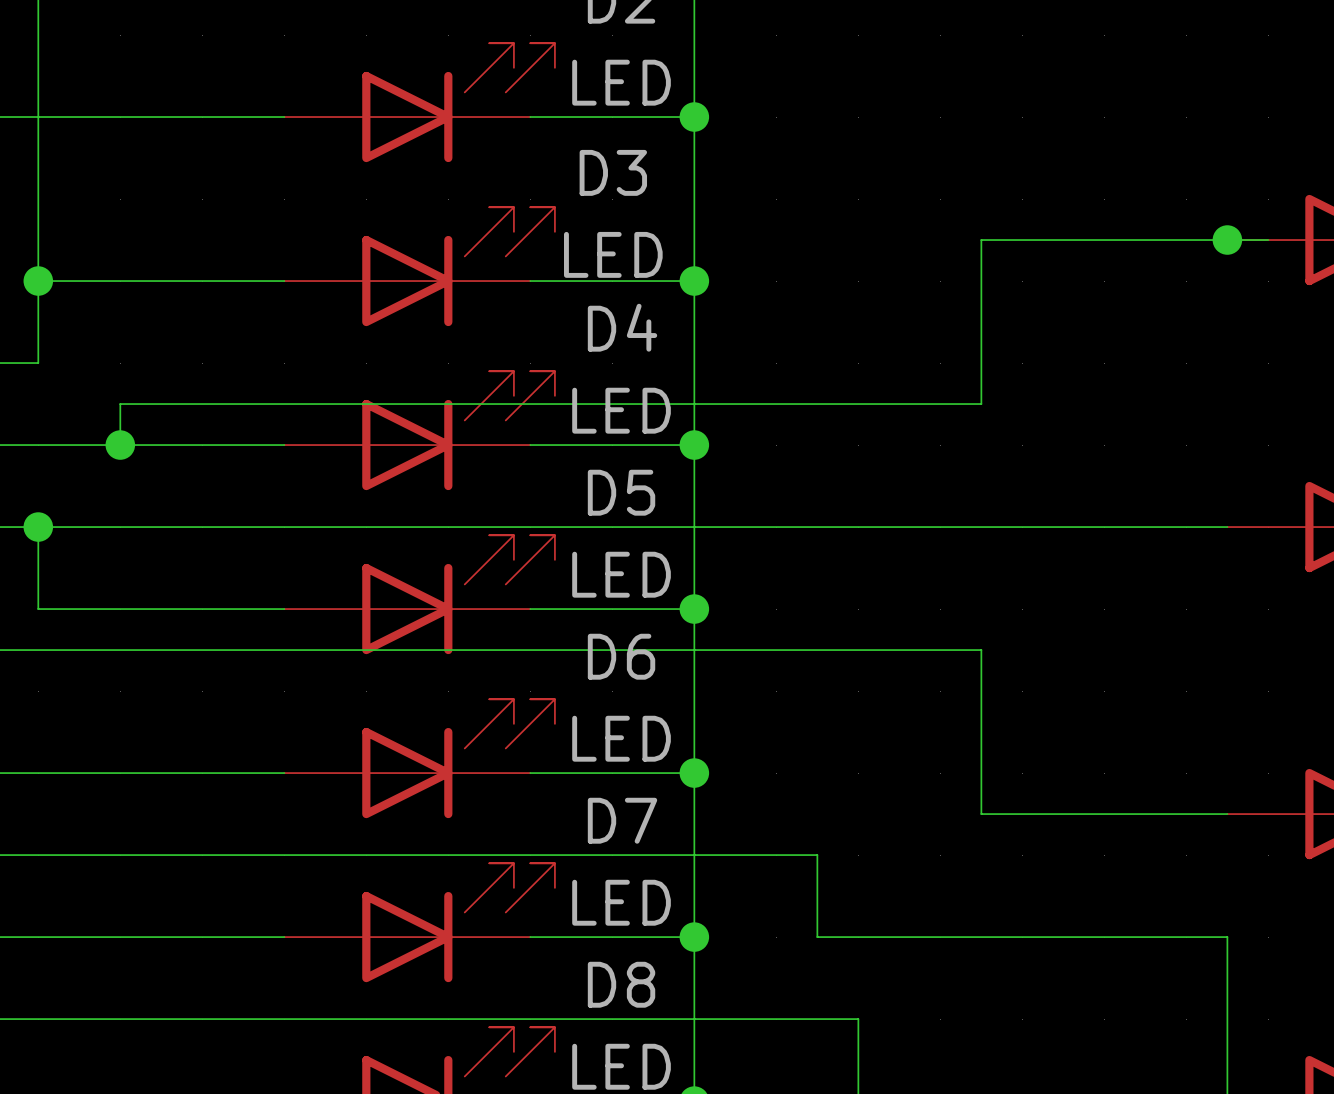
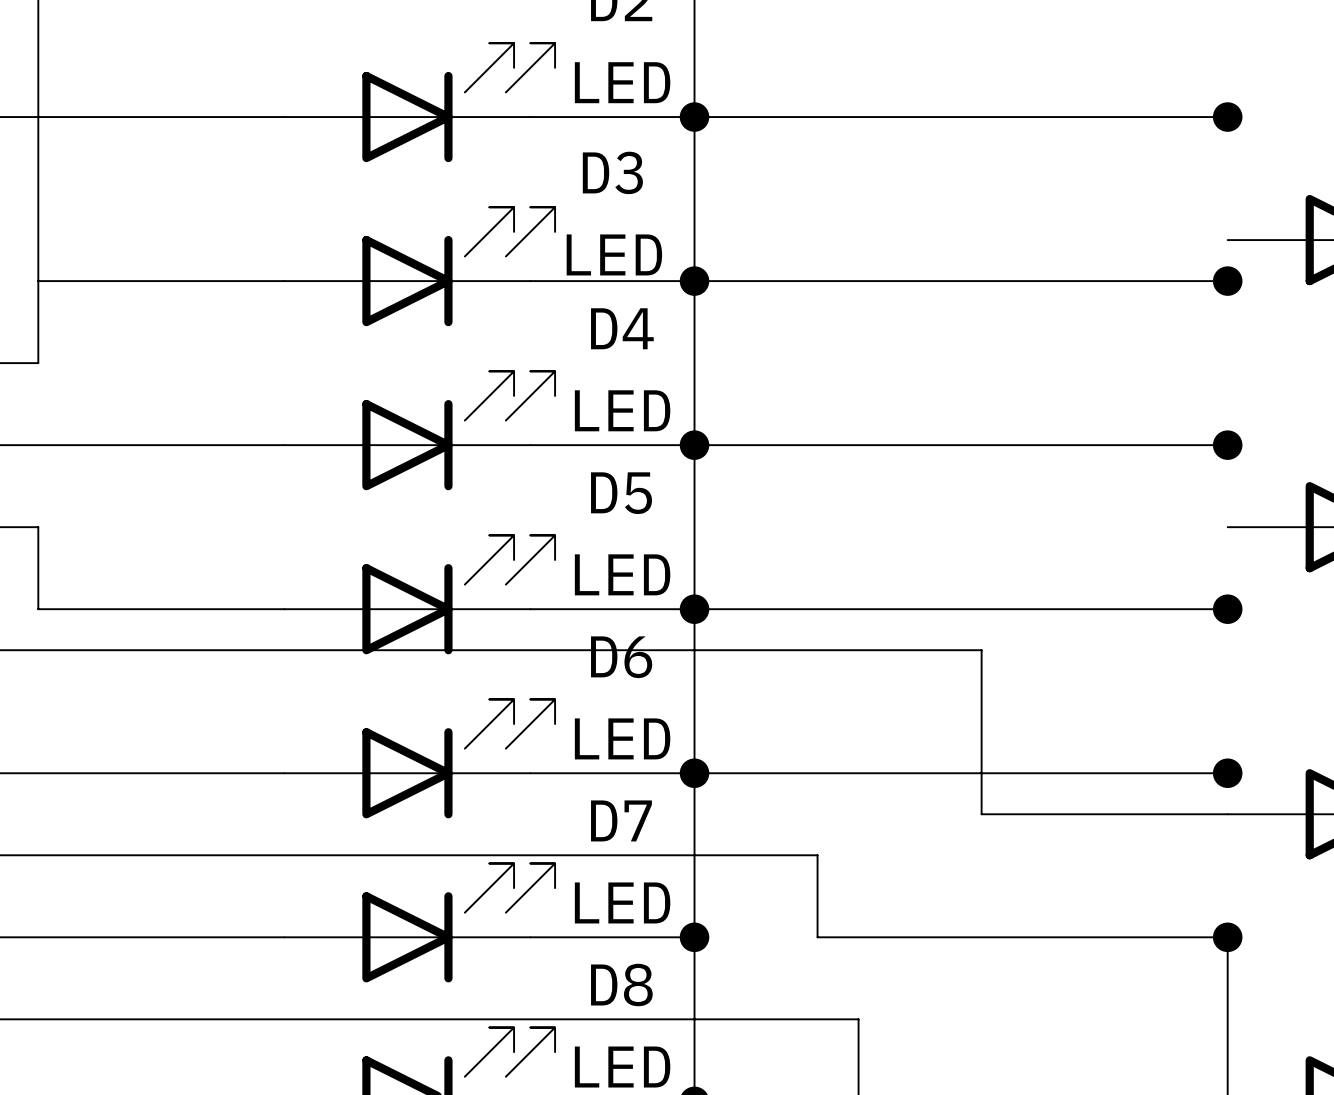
wire: none -> (694, 117) (1227, 117)
junction: none -> (1227, 117)
junction position: (1227, 240) -> (1227, 281)
wire: (1268, 240) (981, 240) (981, 404) (120, 404) (120, 445) -> none
junction: (38, 281) -> none
wire: none -> (694, 281) (1227, 281)
junction: (120, 445) -> none
wire: none -> (694, 445) (1227, 445)
junction: none -> (1227, 445)
wire: (38, 527) (1227, 527) -> none
junction: (38, 527) -> none
wire: none -> (694, 609) (1227, 609)
junction: none -> (1227, 609)
wire: none -> (694, 773) (1227, 773)
junction: none -> (1227, 773)
junction: none -> (1227, 937)

